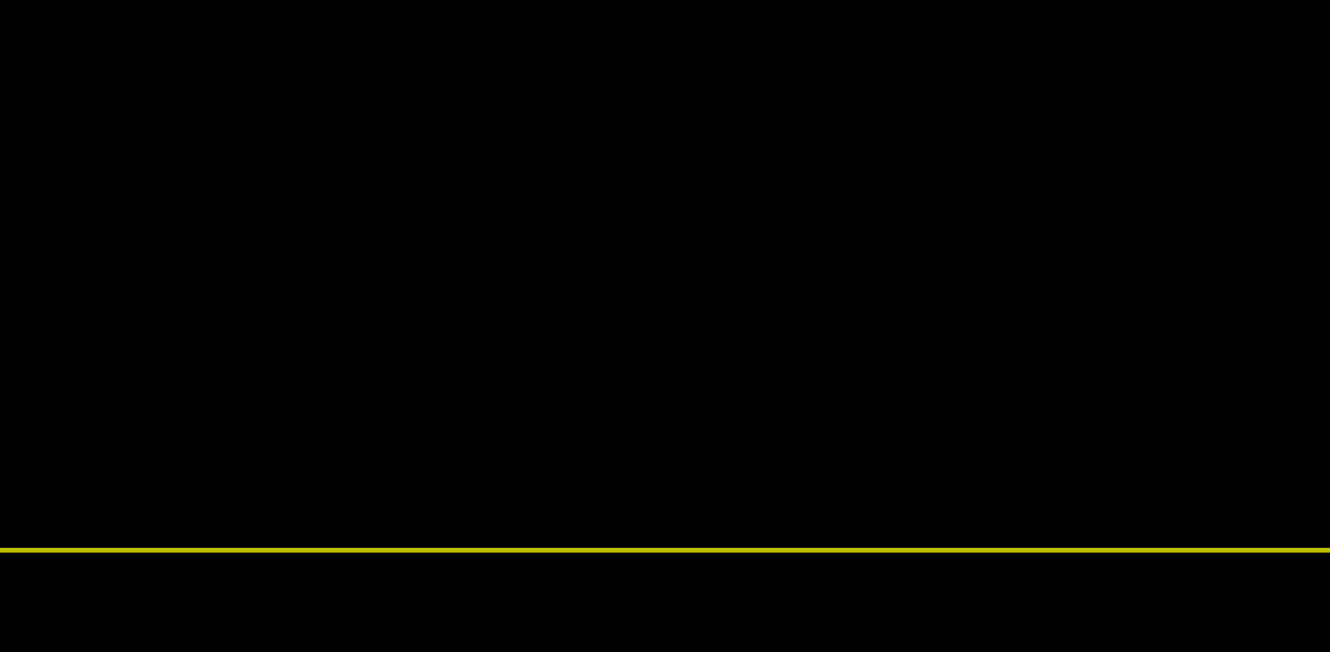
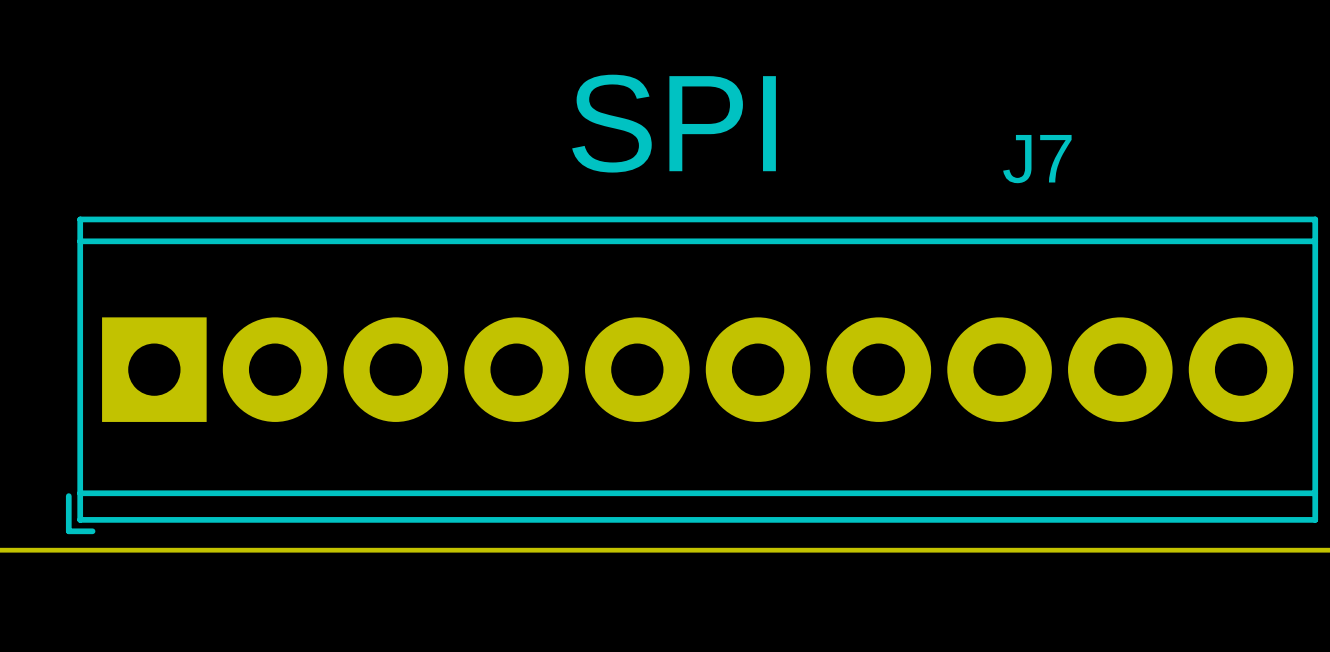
text: none -> SPI (674, 123)
J7: none -> (692, 375)

